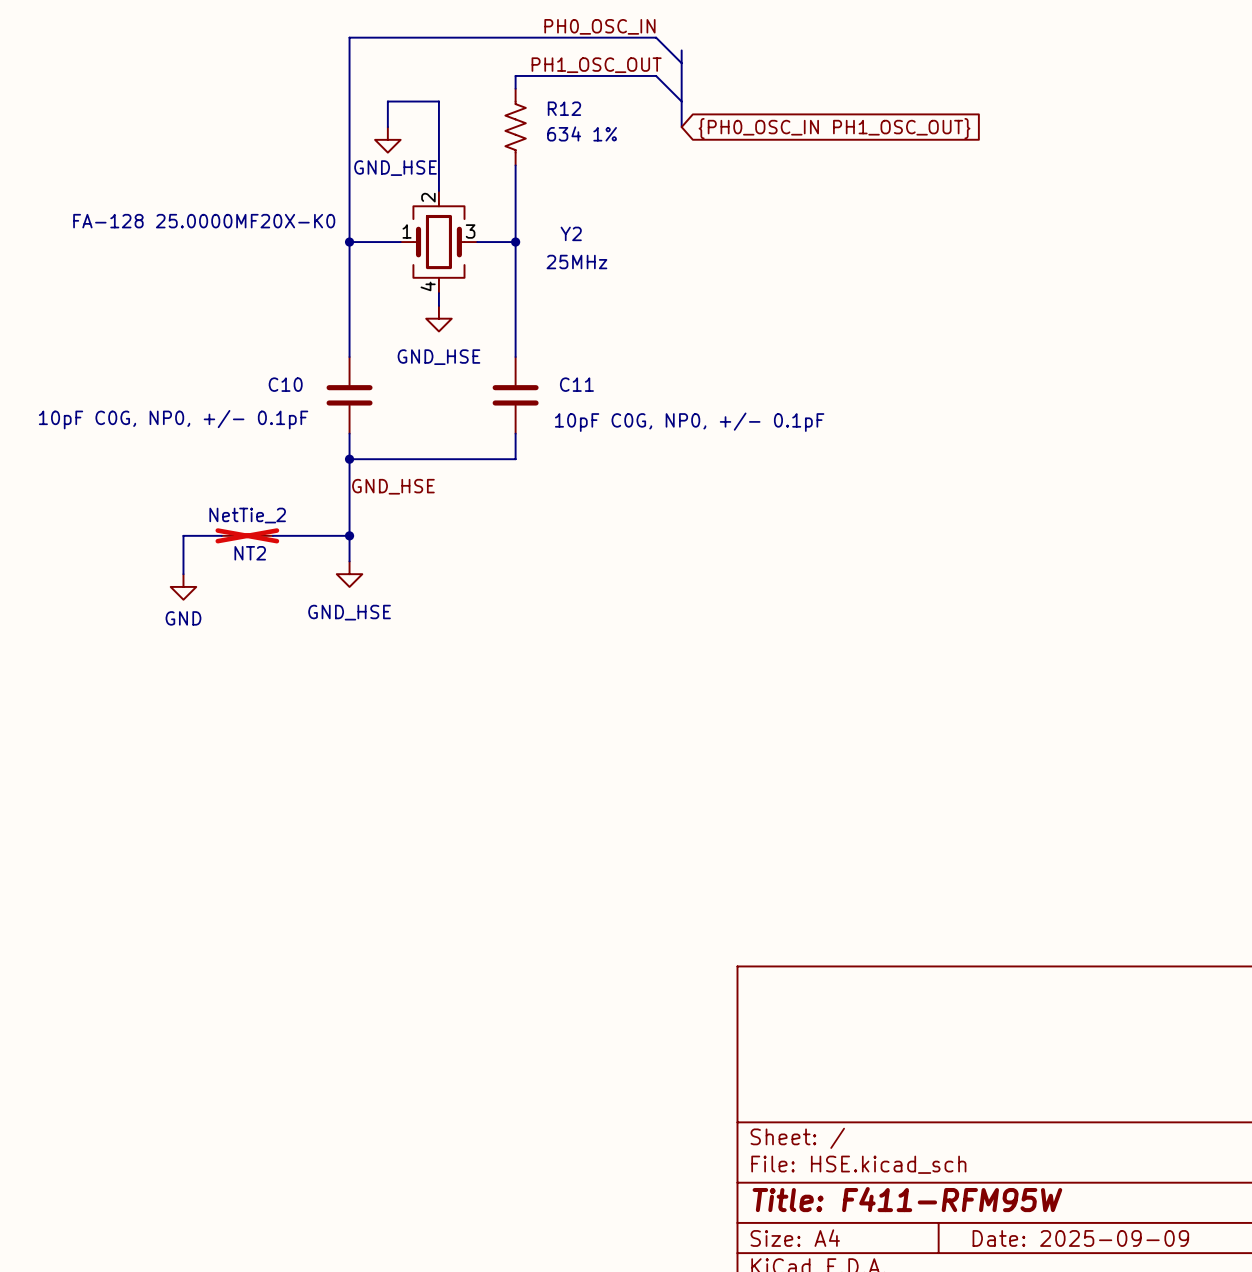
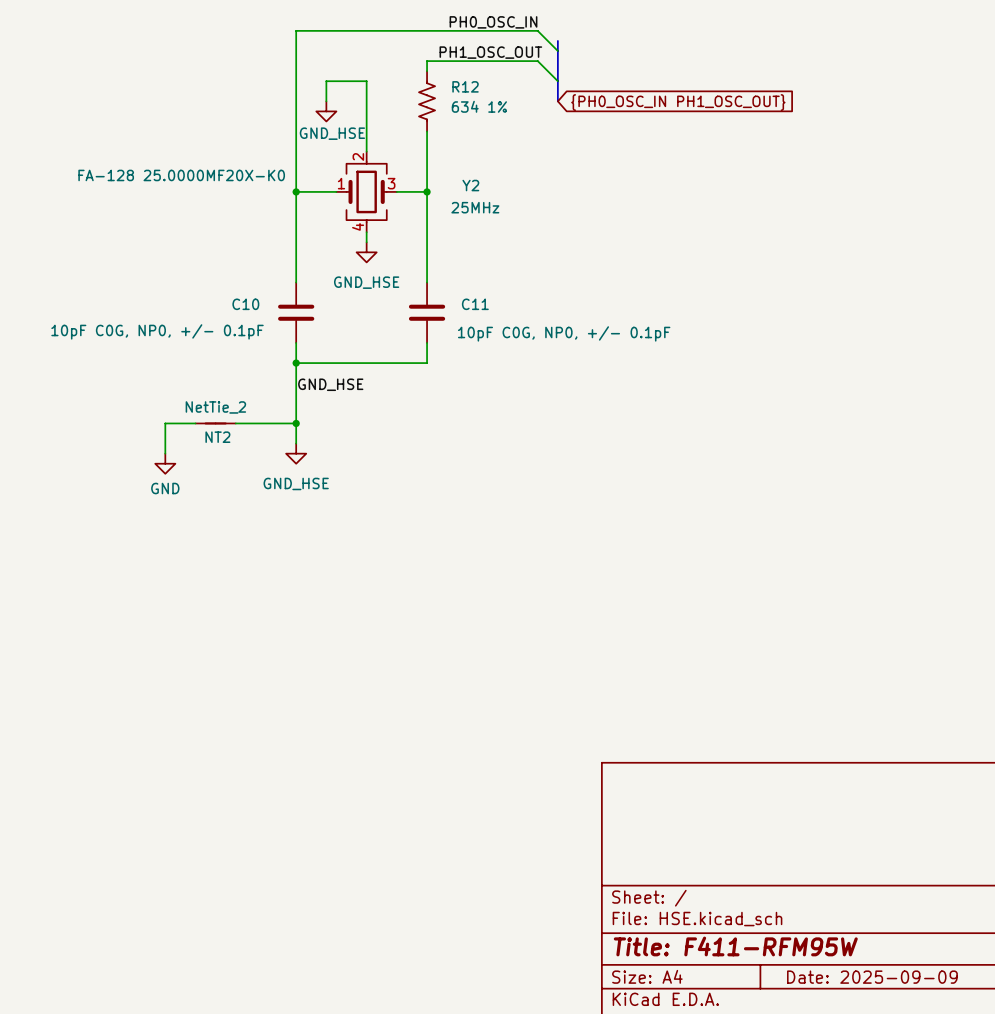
NT2 do-not-place cross: (247, 535) -> none

